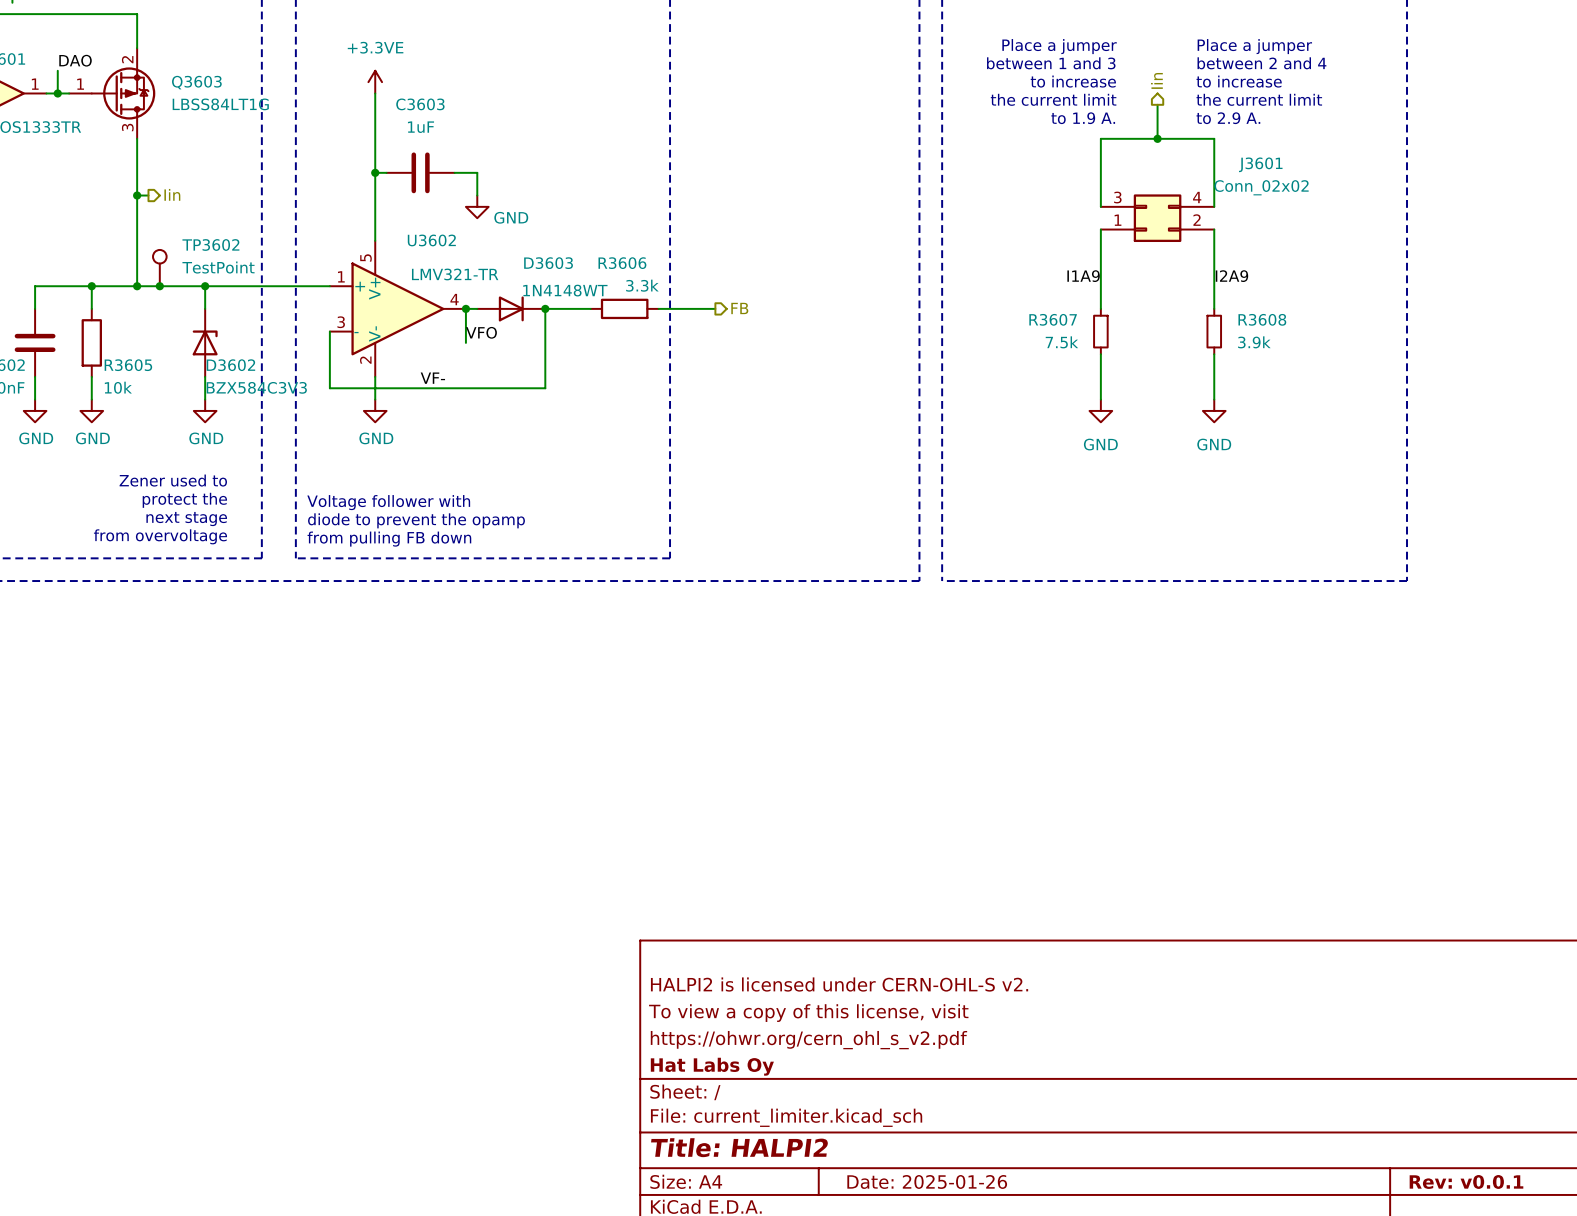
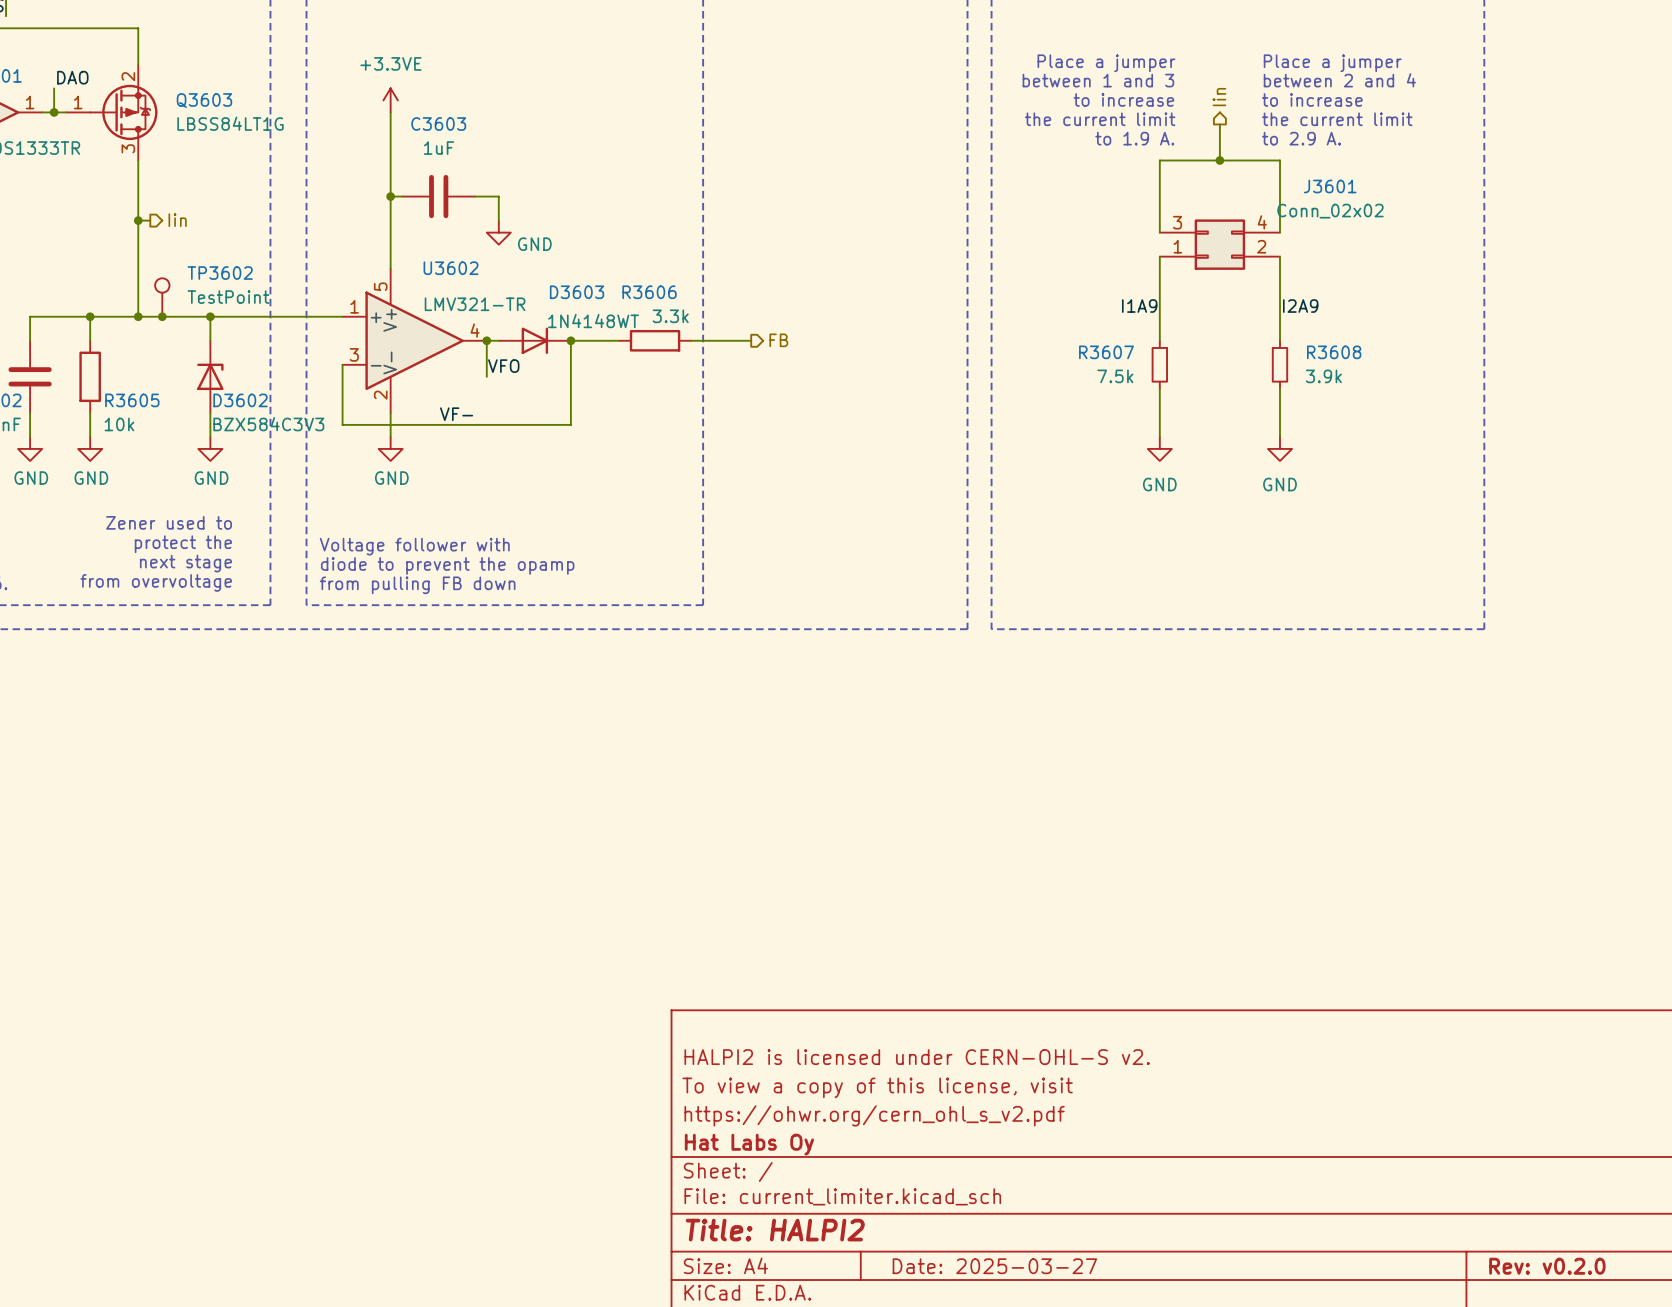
title block: Date: 2025-01-26 (927, 1181) -> Date: 2025-03-27 (994, 1266)
title block: Rev: v0.0.1 (1466, 1181) -> Rev: v0.2.0 (1547, 1266)

